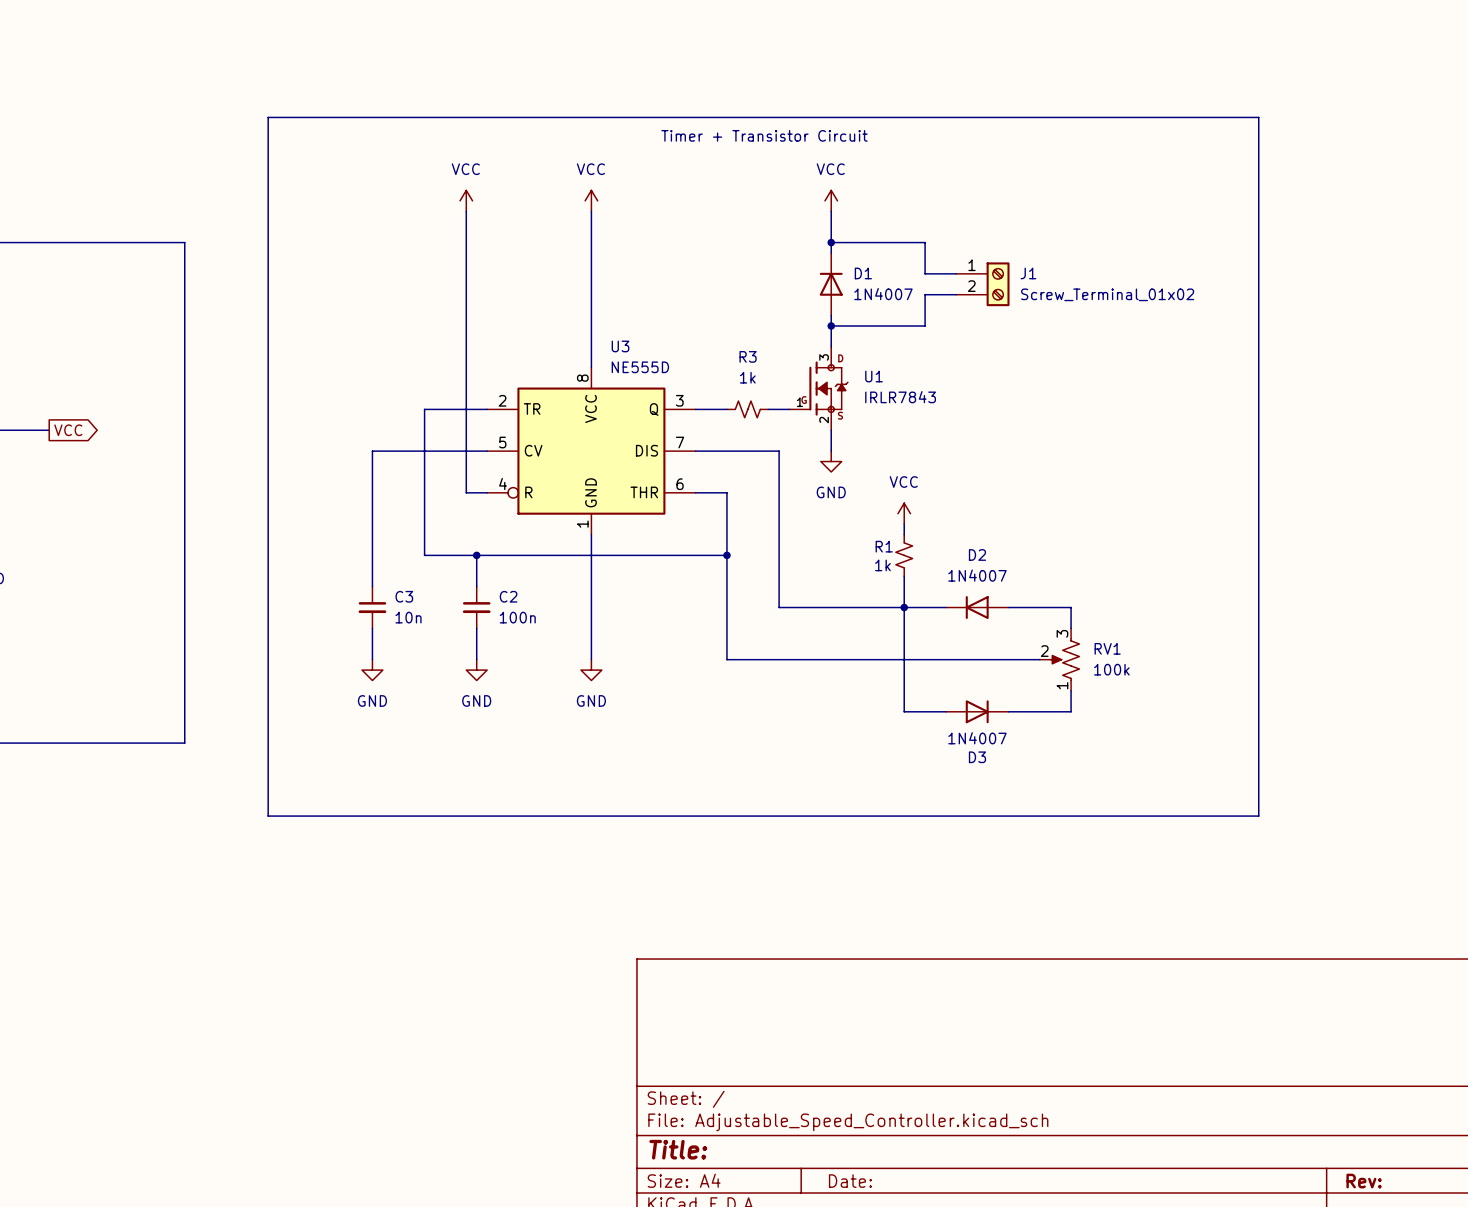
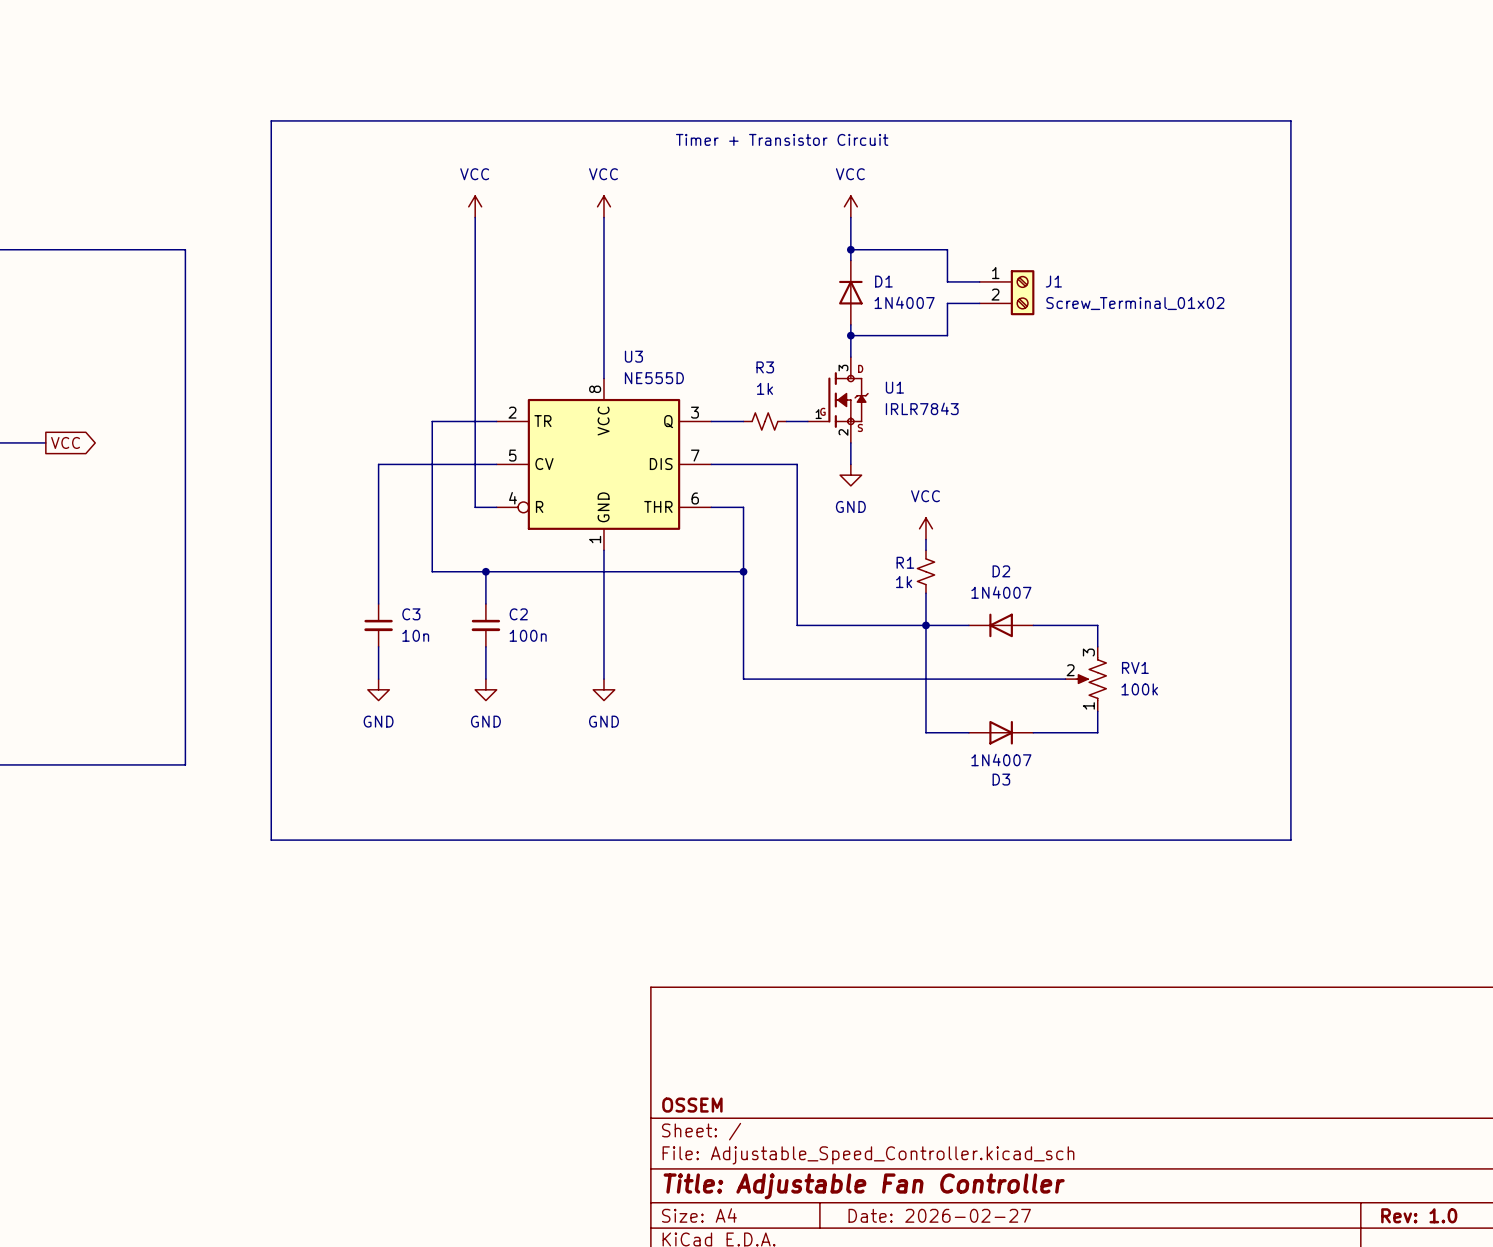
title block: none -> OSSEM (692, 1105)
title block: Title: (678, 1149) -> Title: Adjustable Fan Controller (864, 1186)
title block: Date: (850, 1181) -> Date: 2026-02-27 (939, 1215)
title block: Rev: (1364, 1181) -> Rev: 1.0 (1419, 1215)

